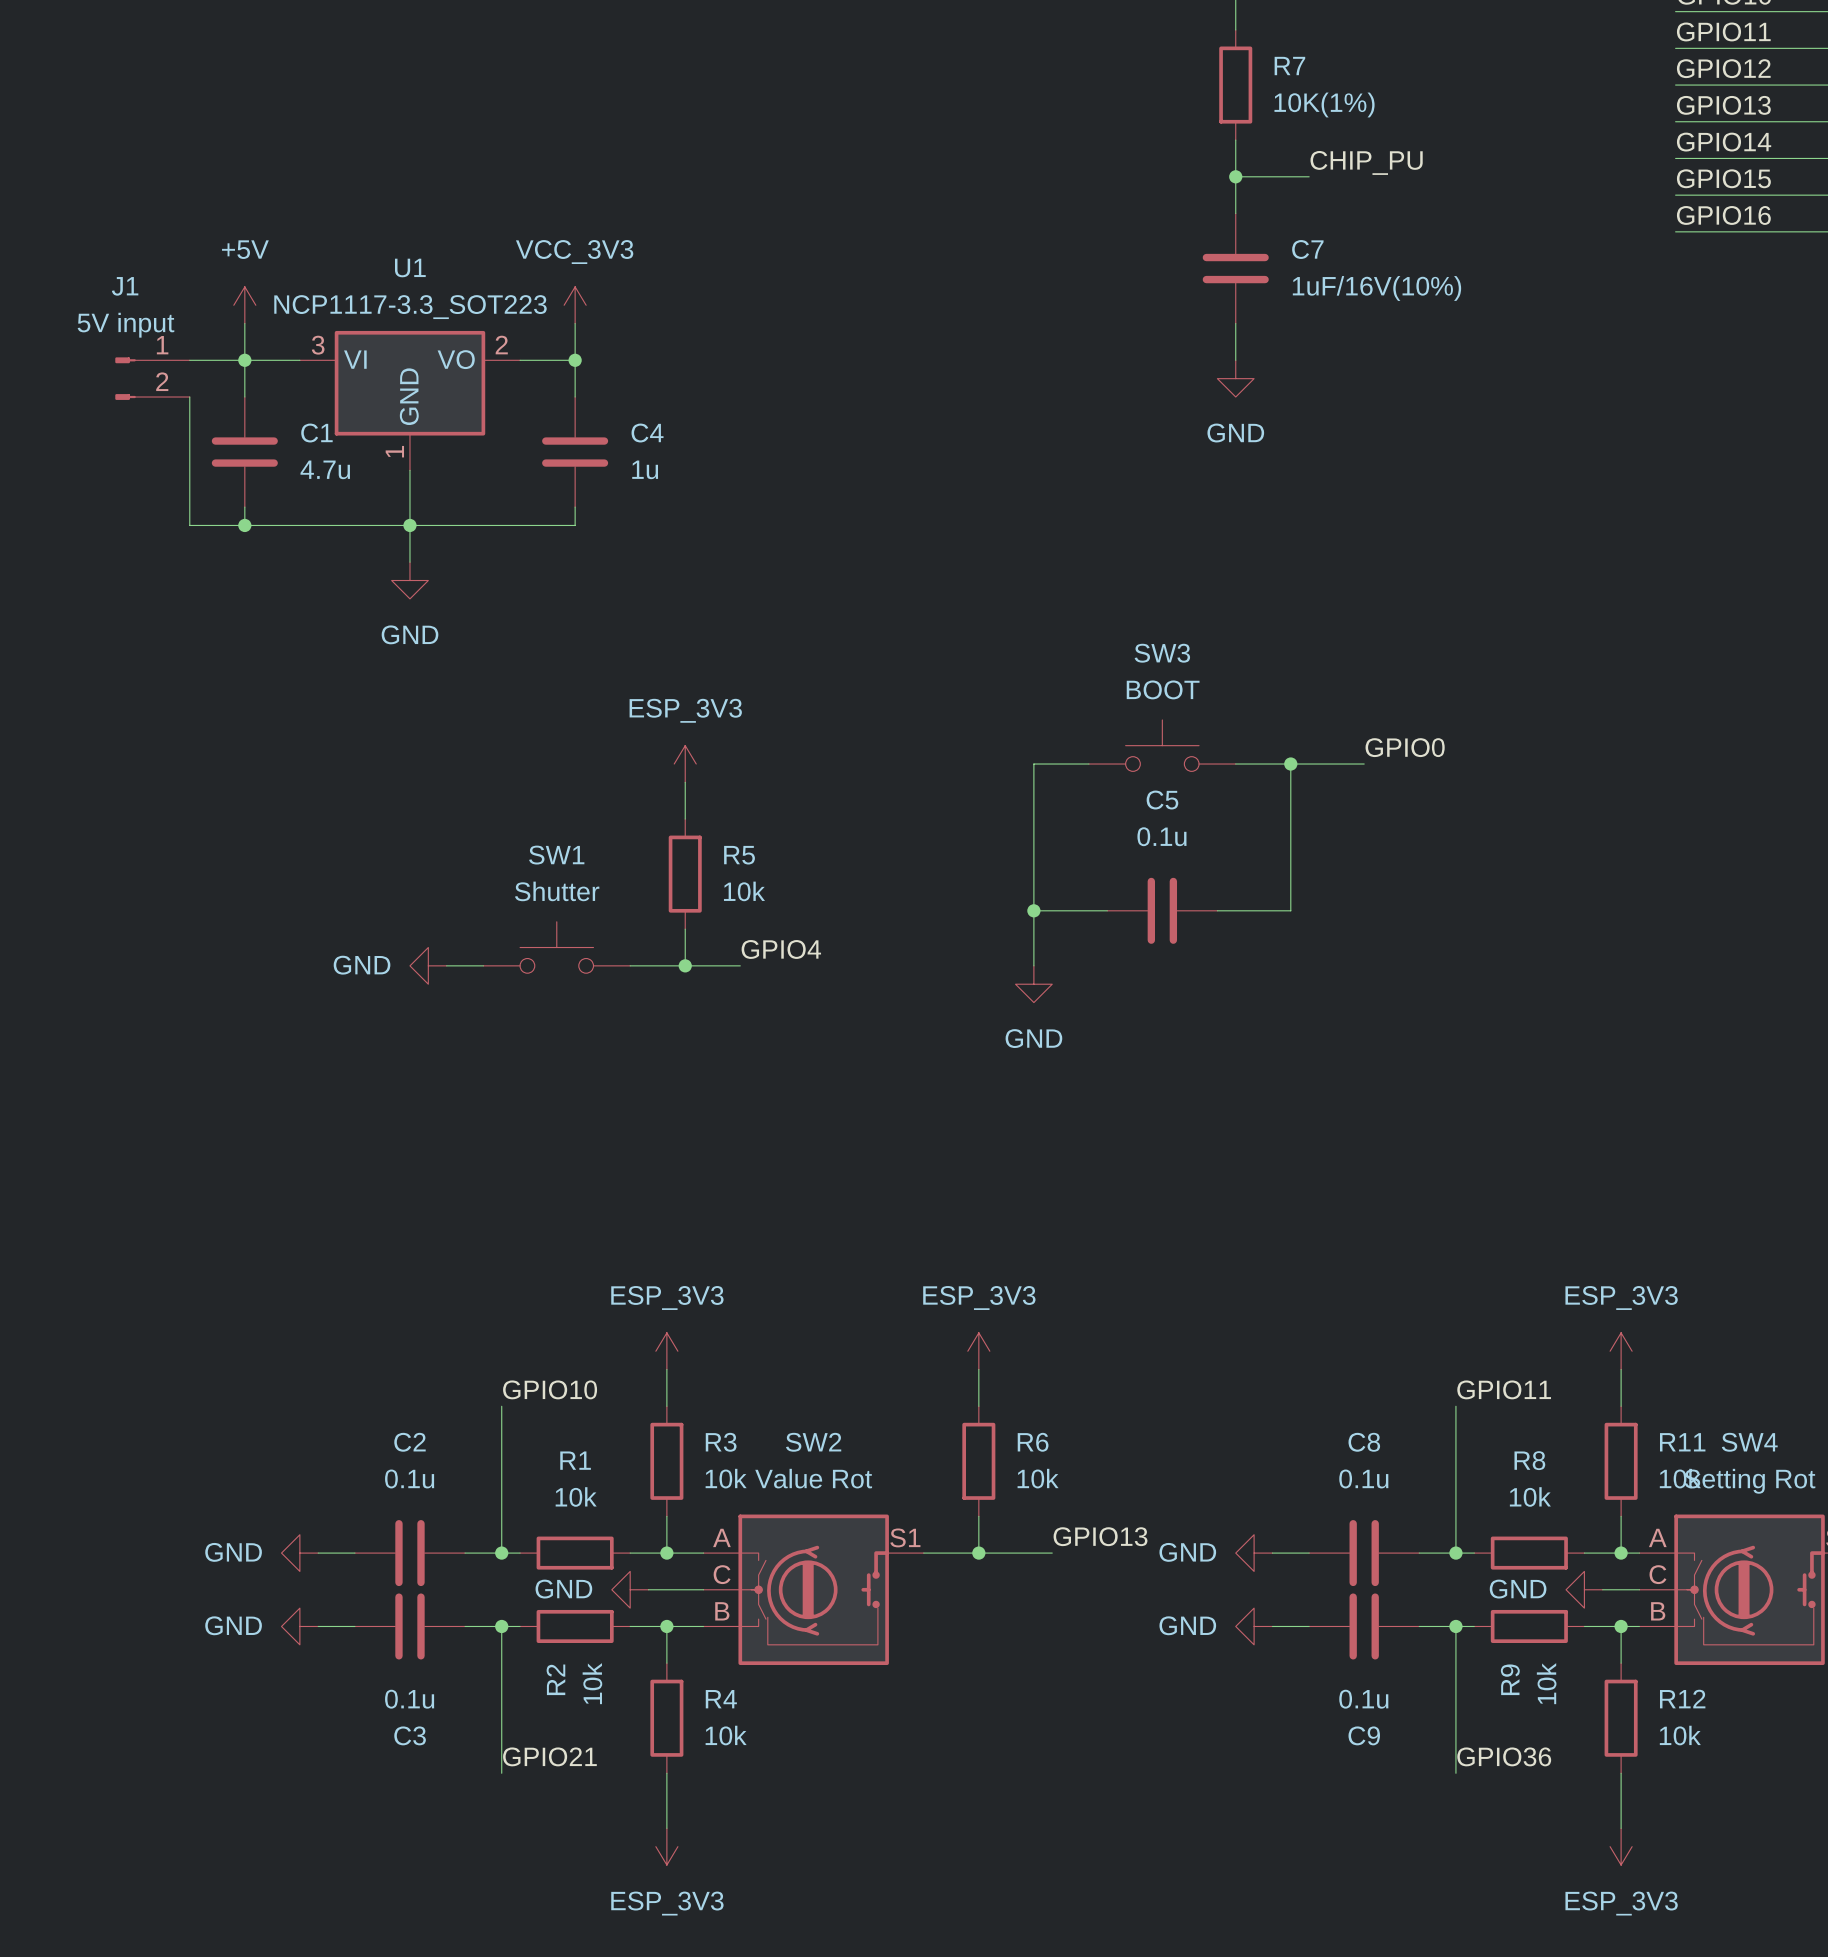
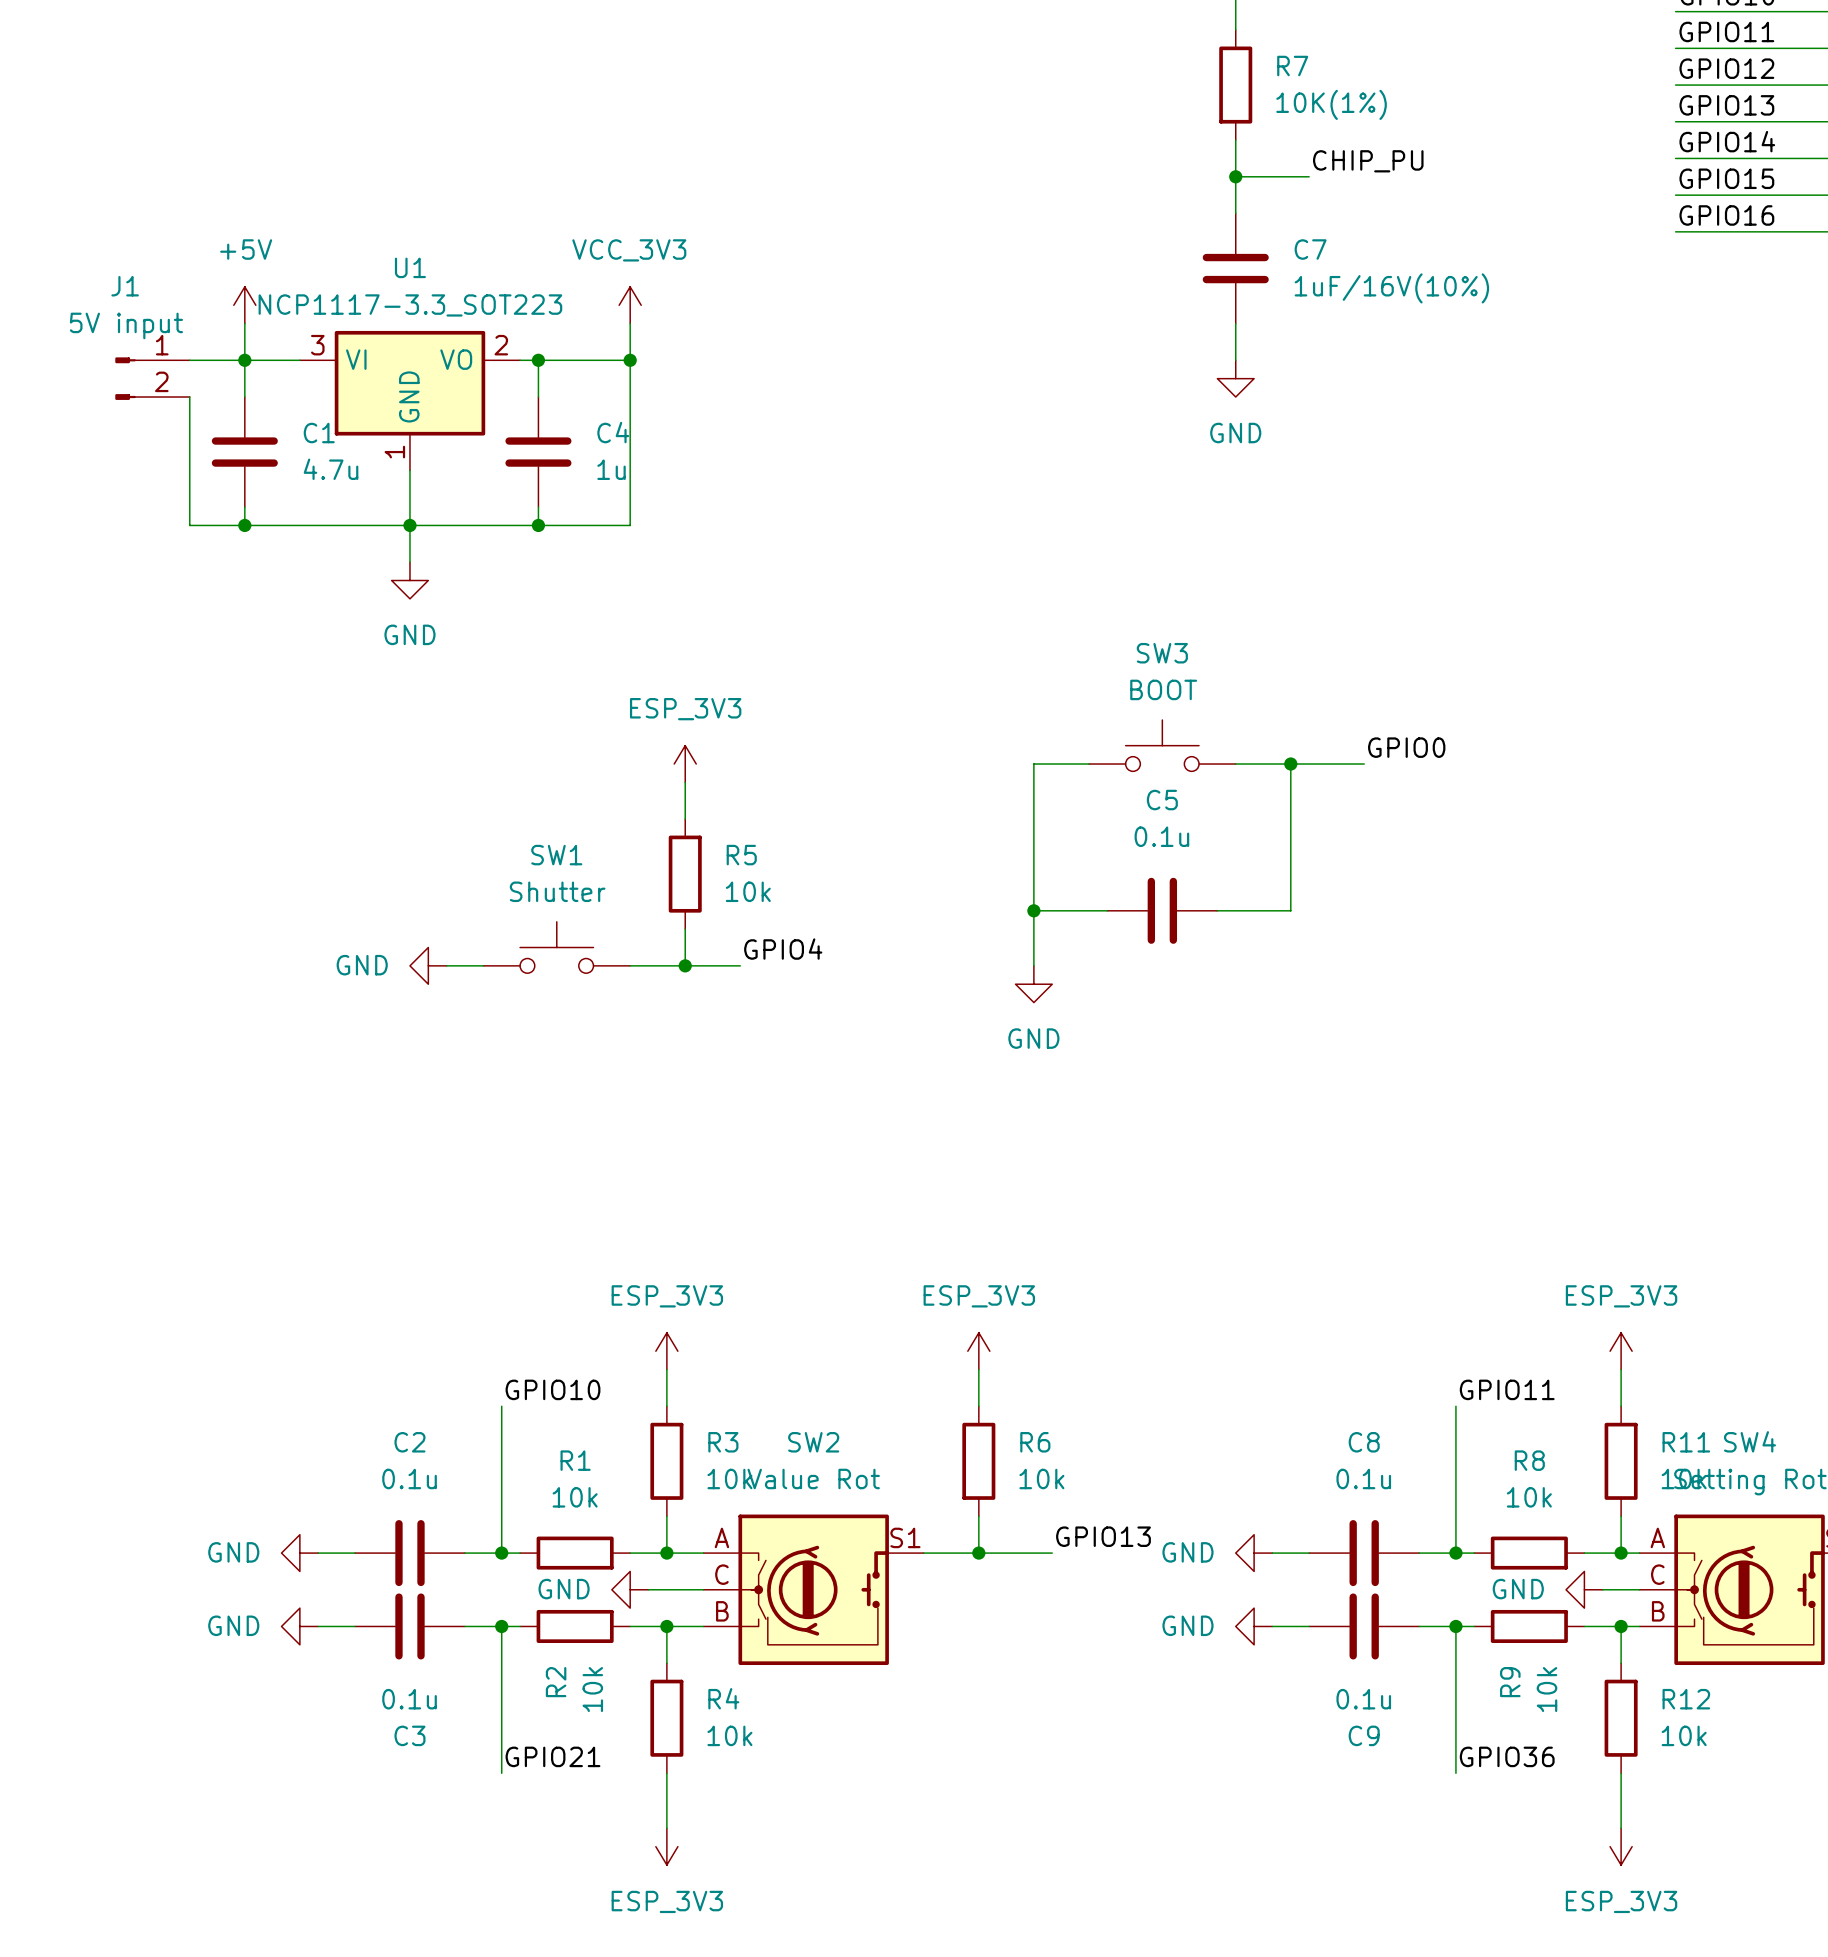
power symbol position: VCC_3V3 (575, 305) -> VCC_3V3 (630, 305)
wire: (575, 323) (575, 397) -> none
wire: none -> (538, 360) (538, 397)
junction: none -> (538, 360)
wire: none -> (575, 360) (630, 360)
junction: (575, 360) -> none
junction: none -> (630, 360)
C4 position: (575, 452) -> (538, 452)
wire: none -> (538, 507) (538, 525)
wire: (575, 507) (575, 525) -> (630, 323) (630, 525) (575, 525)
junction: none -> (538, 525)

